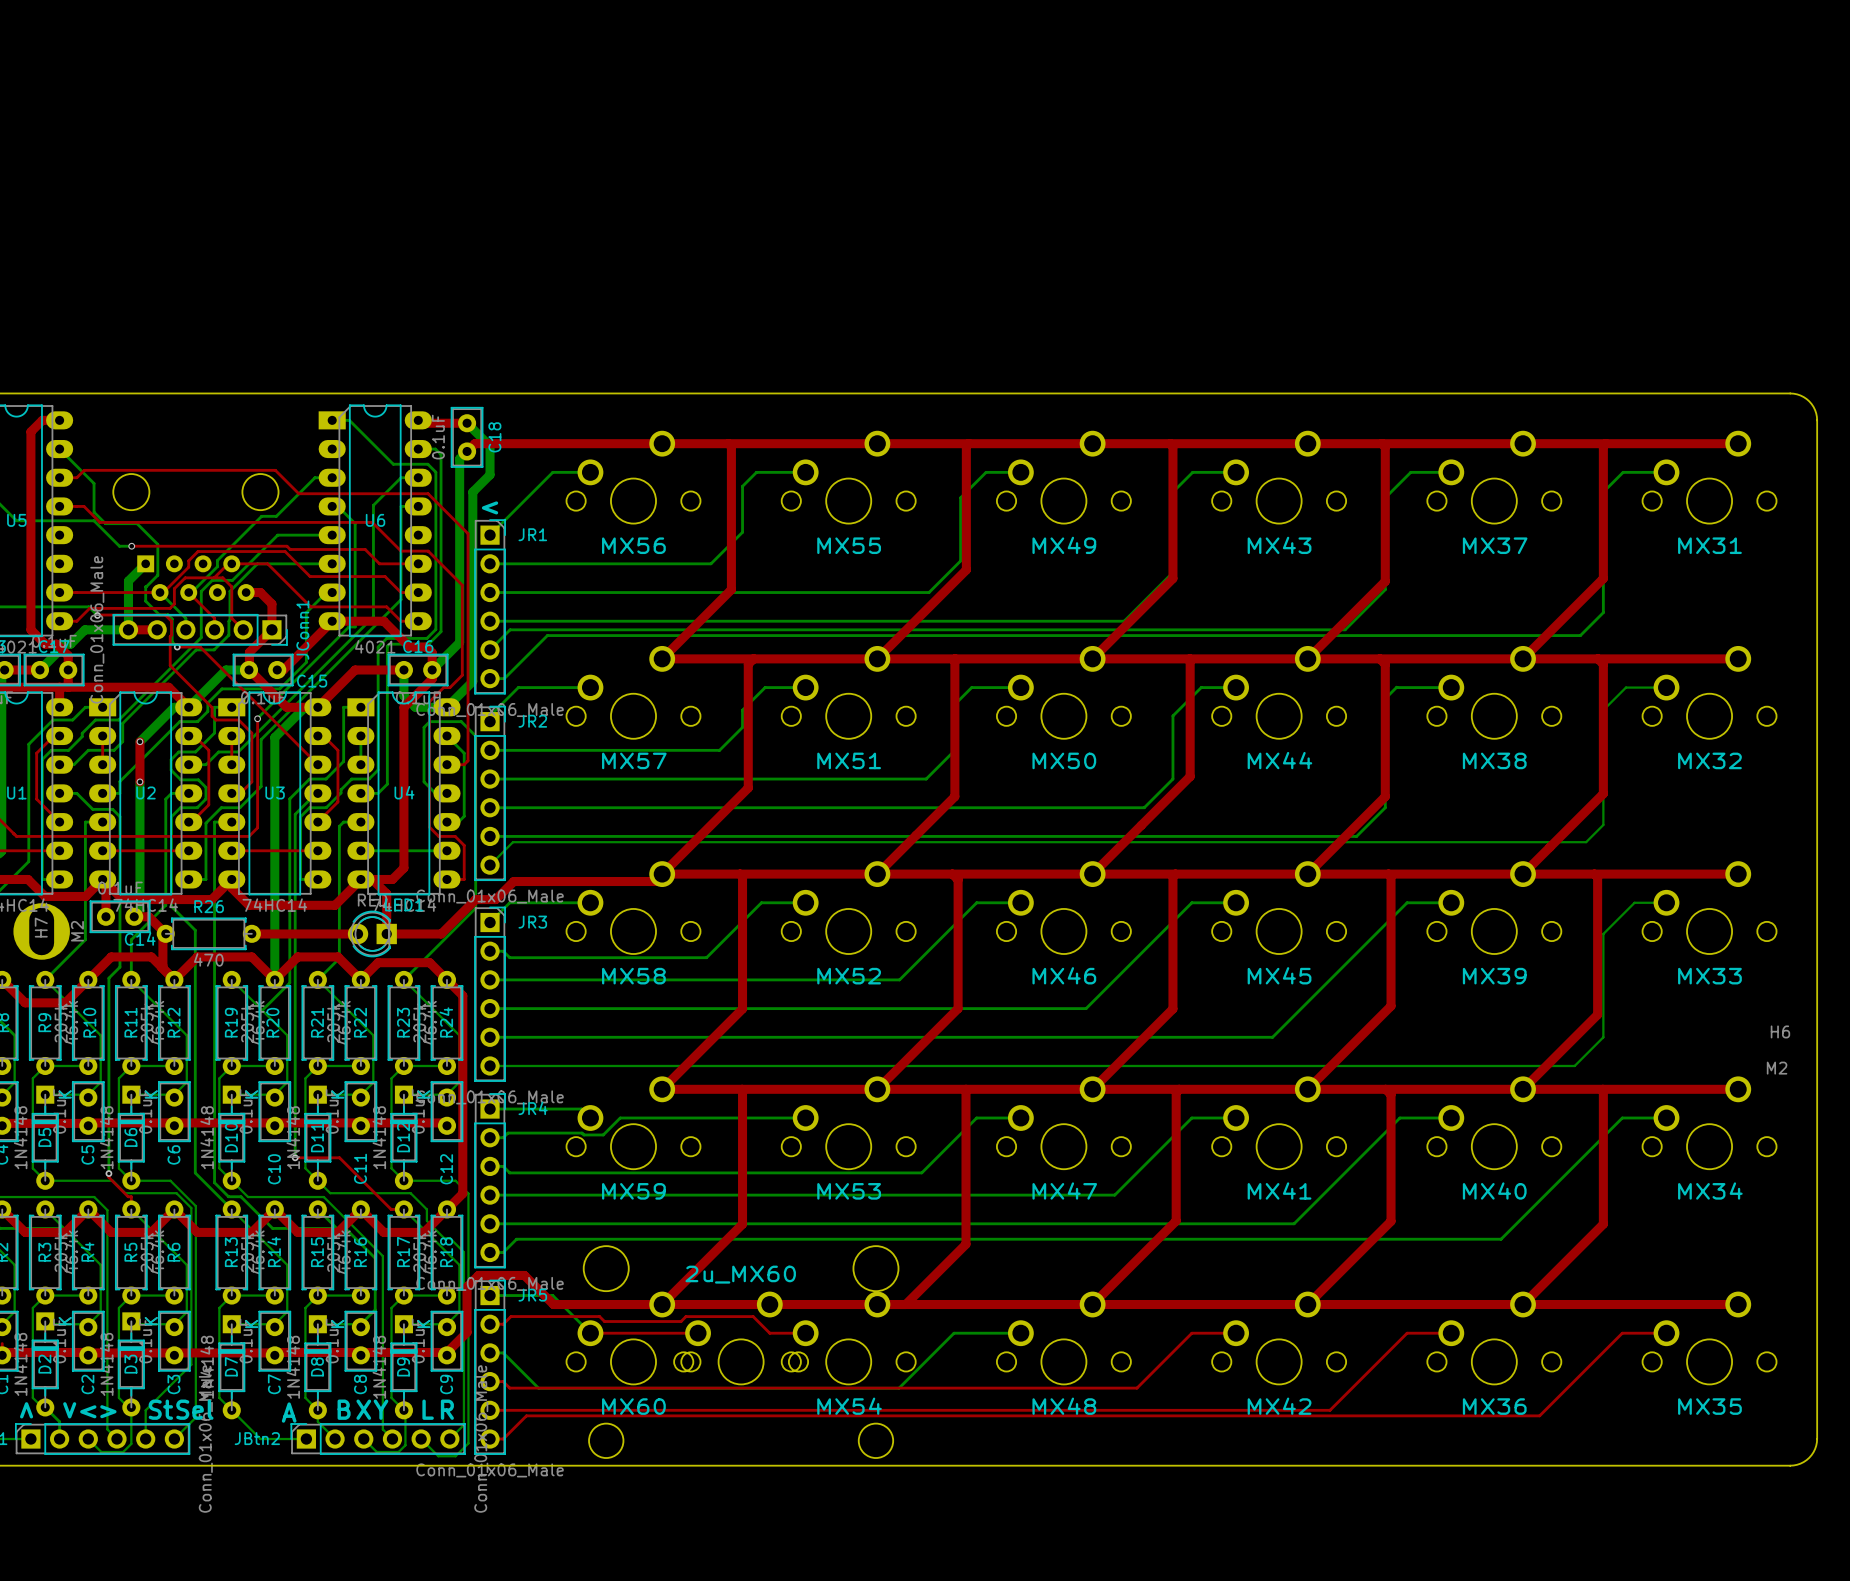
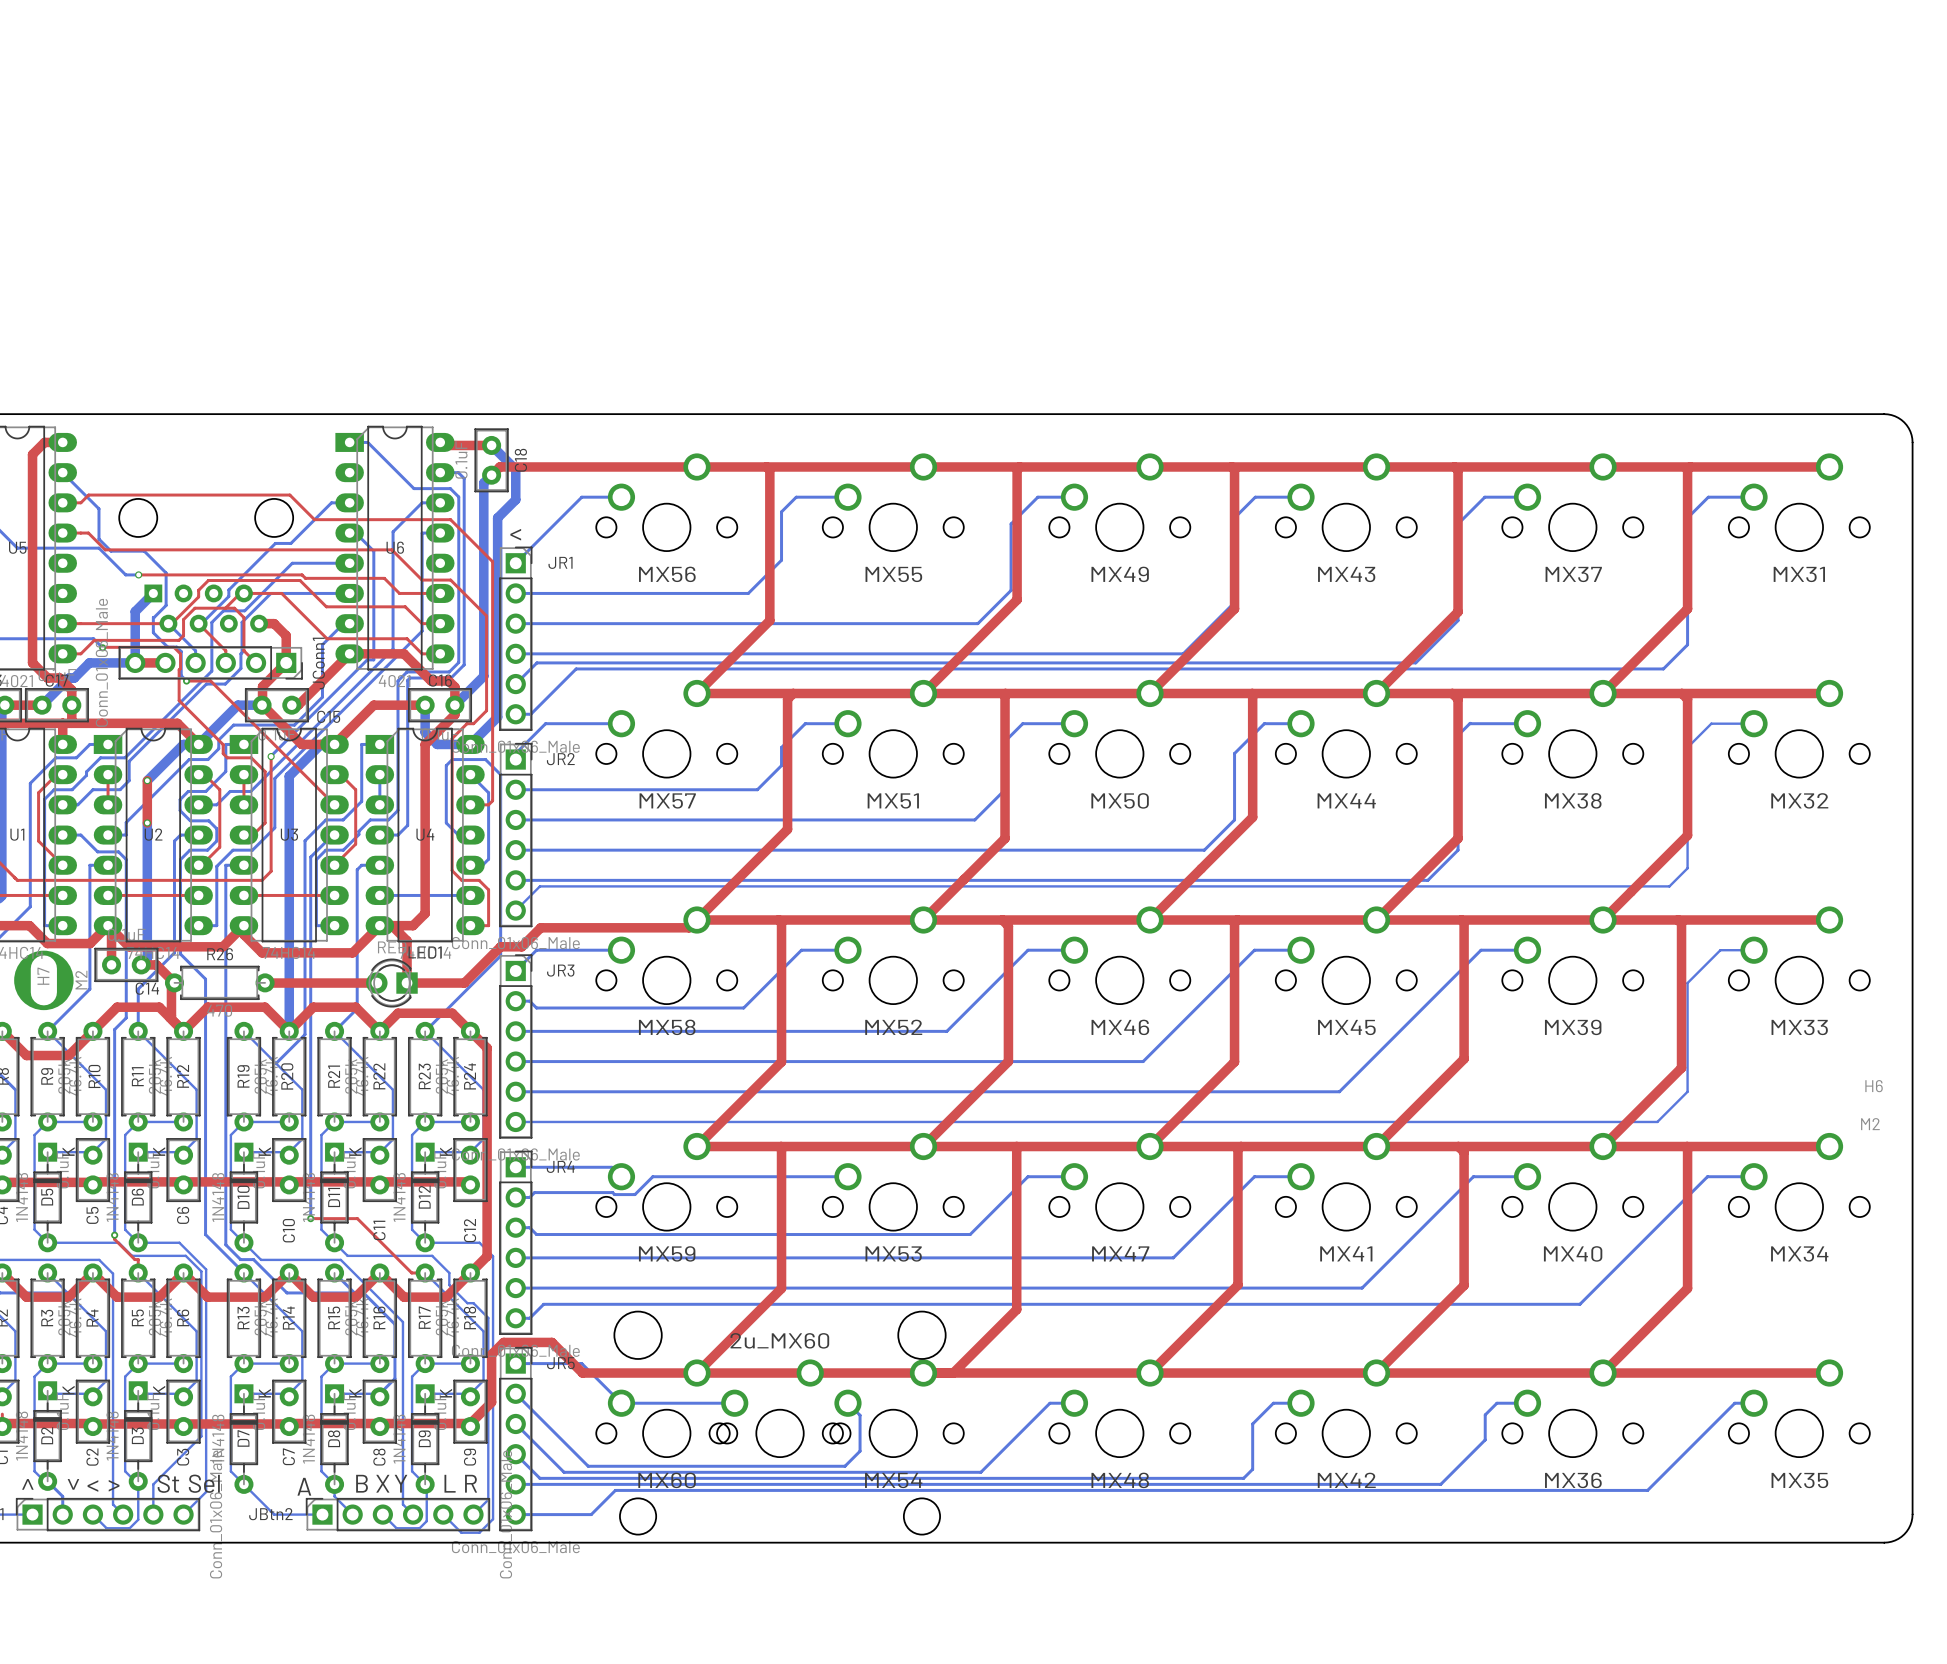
top track: (490, 1324) (503, 1324) (511, 1316) (599, 1316) (604, 1321) (681, 1321) (685, 1316) (753, 1316) (769, 1333) (805, 1333) -> none
bottom track: none -> (515, 1393) (588, 1466) (844, 1466) (860, 1451) (860, 1415) (847, 1403)
top track: (590, 1333) (698, 1333) -> none
bottom track: none -> (621, 1403) (734, 1403)
bottom track: (997, 1333) (954, 1333) (898, 1388) (538, 1388) (503, 1352) (490, 1352) -> (1049, 1403) (980, 1472) (564, 1472) (515, 1423)
top track: (1236, 1333) (1191, 1333) (1136, 1388) (509, 1388) (503, 1381) (490, 1381) -> none
bottom track: none -> (1301, 1403) (1273, 1403) (1252, 1423) (1252, 1469) (1243, 1478) (539, 1478) (515, 1454)
top track: (1451, 1333) (1407, 1333) (1329, 1410) (490, 1410) -> none
bottom track: none -> (1527, 1403) (1496, 1403) (1485, 1414) (1485, 1439) (1440, 1484) (515, 1484)
top track: (1666, 1333) (1622, 1333) (1539, 1415) (526, 1415) (503, 1439) (490, 1439) -> none
bottom track: none -> (1754, 1403) (1734, 1403) (1647, 1490) (615, 1490) (591, 1514) (515, 1514)

